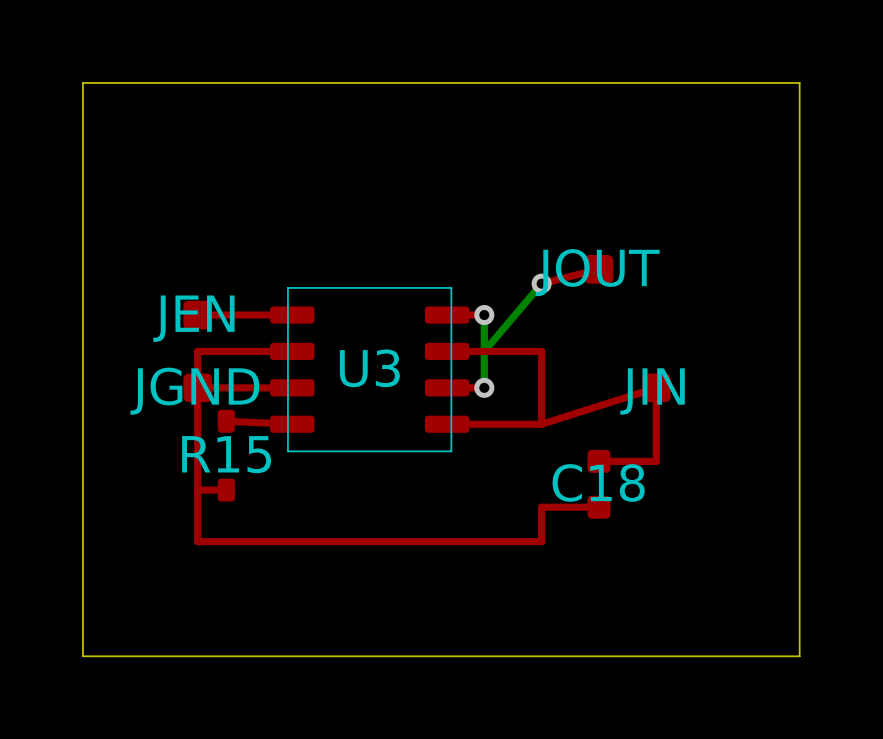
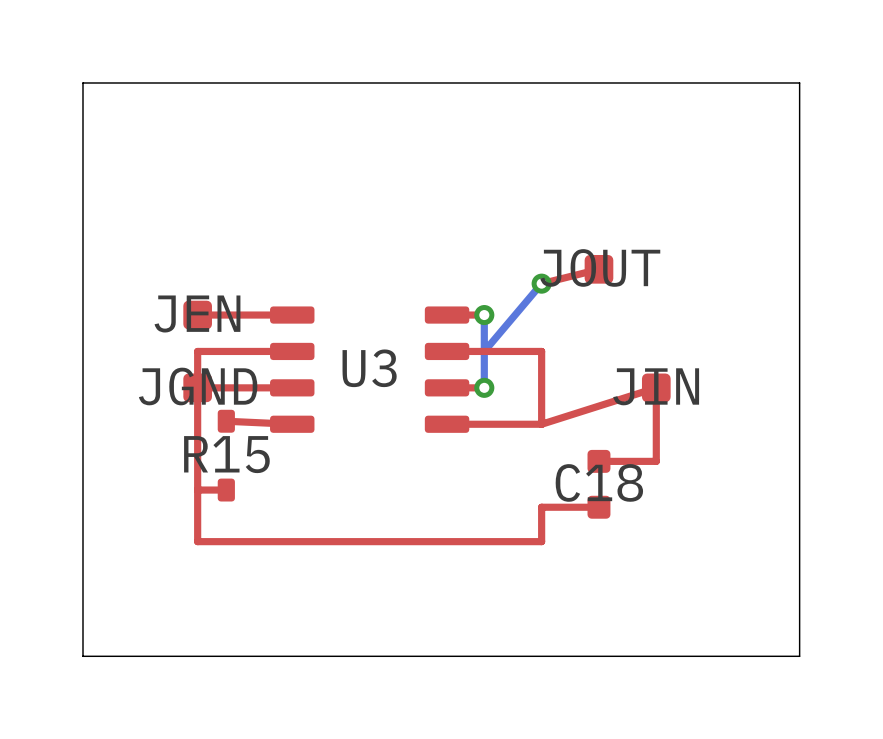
U3 footprint: [270, 287, 470, 453] -> [270, 306, 470, 433]

